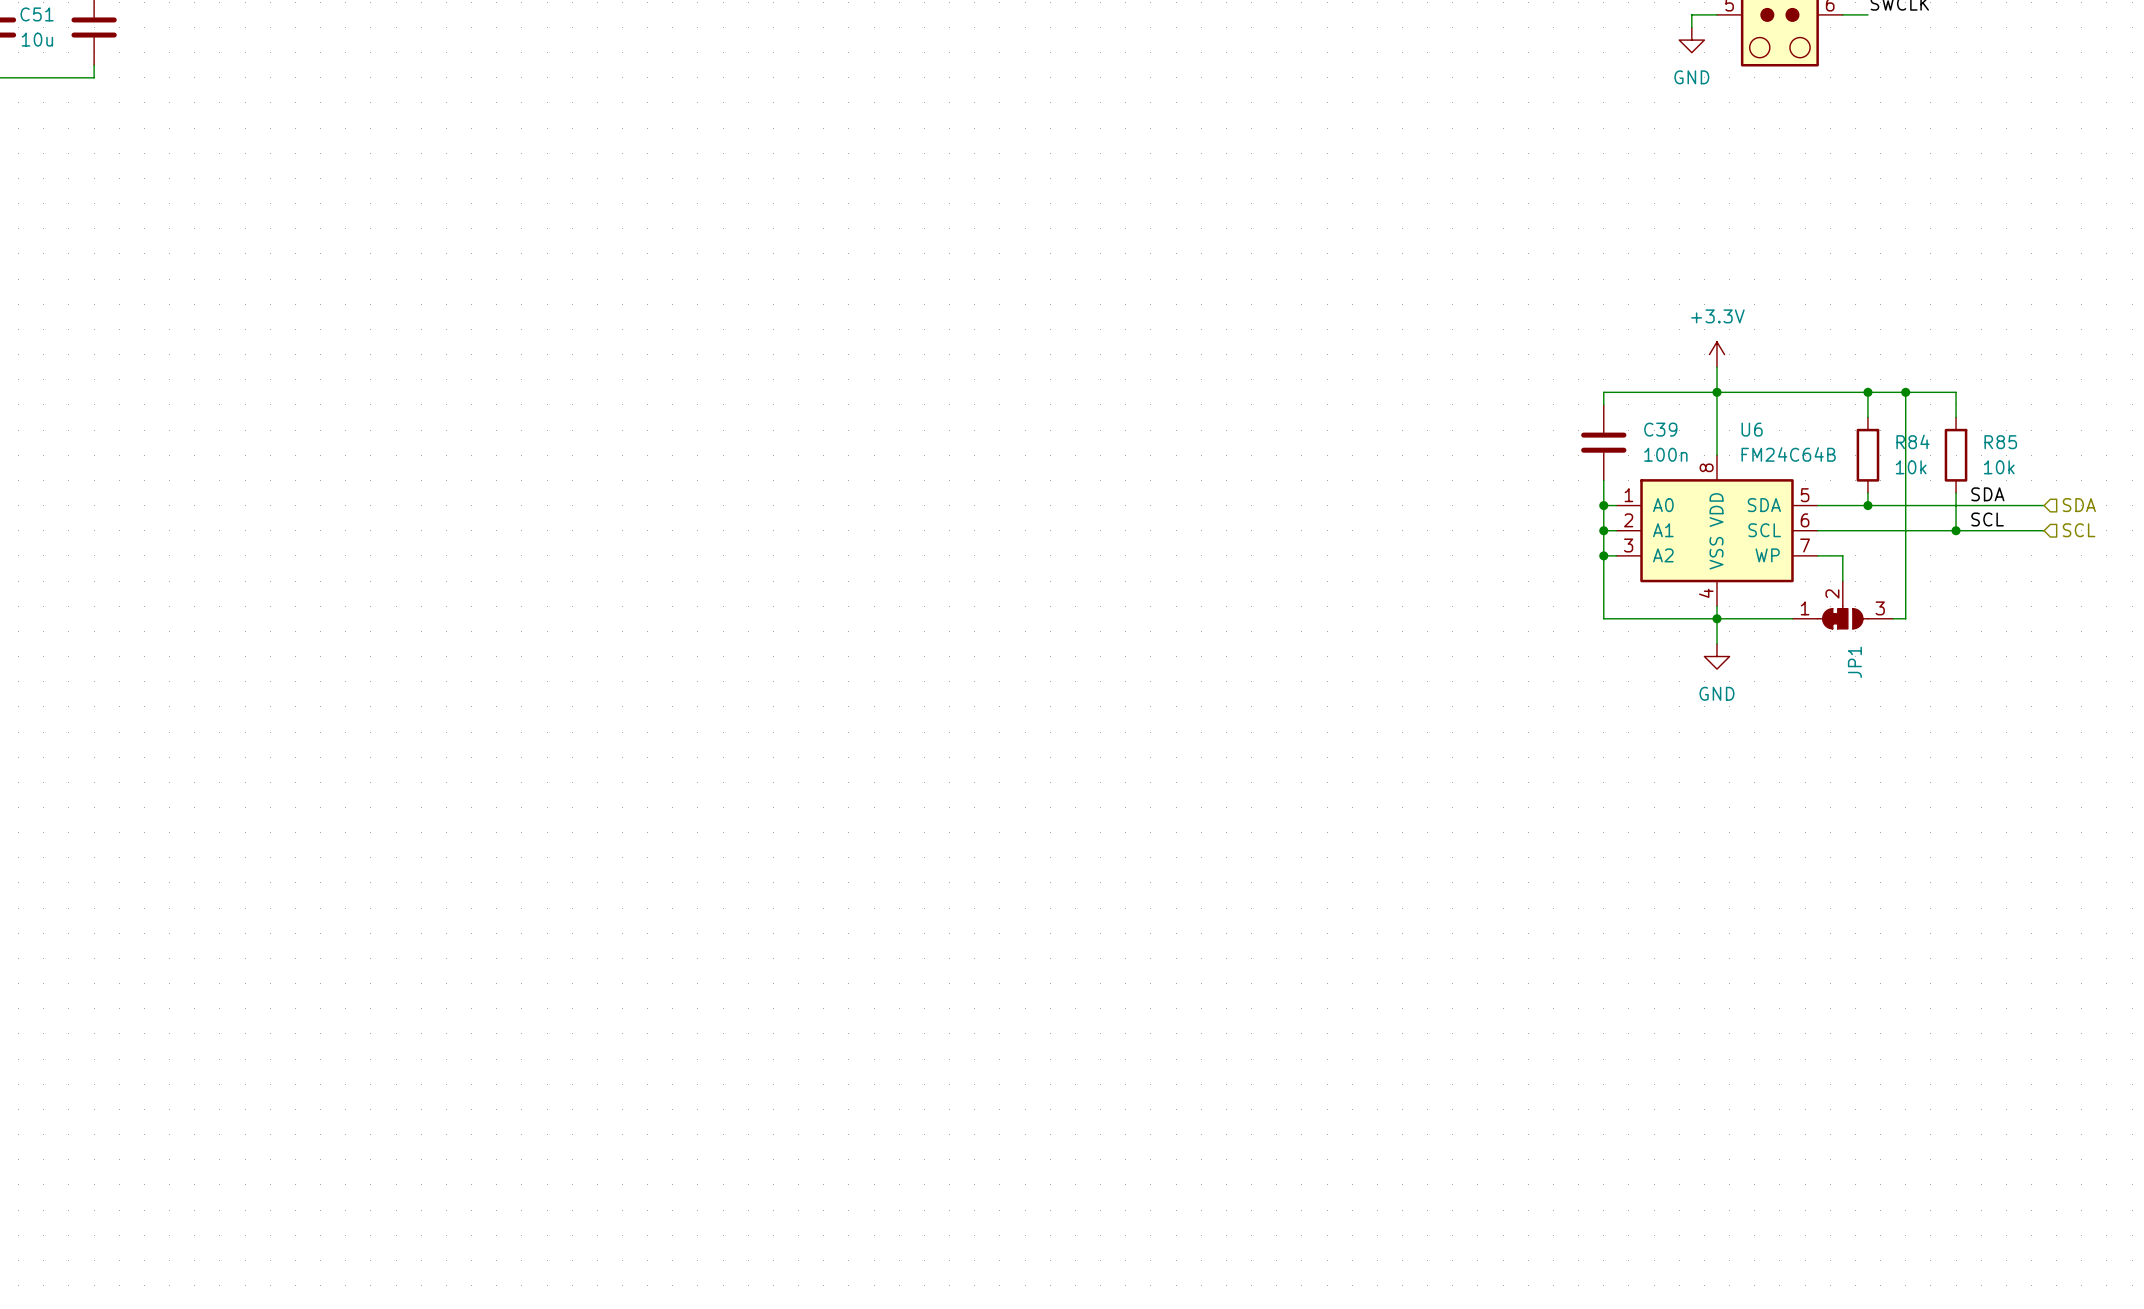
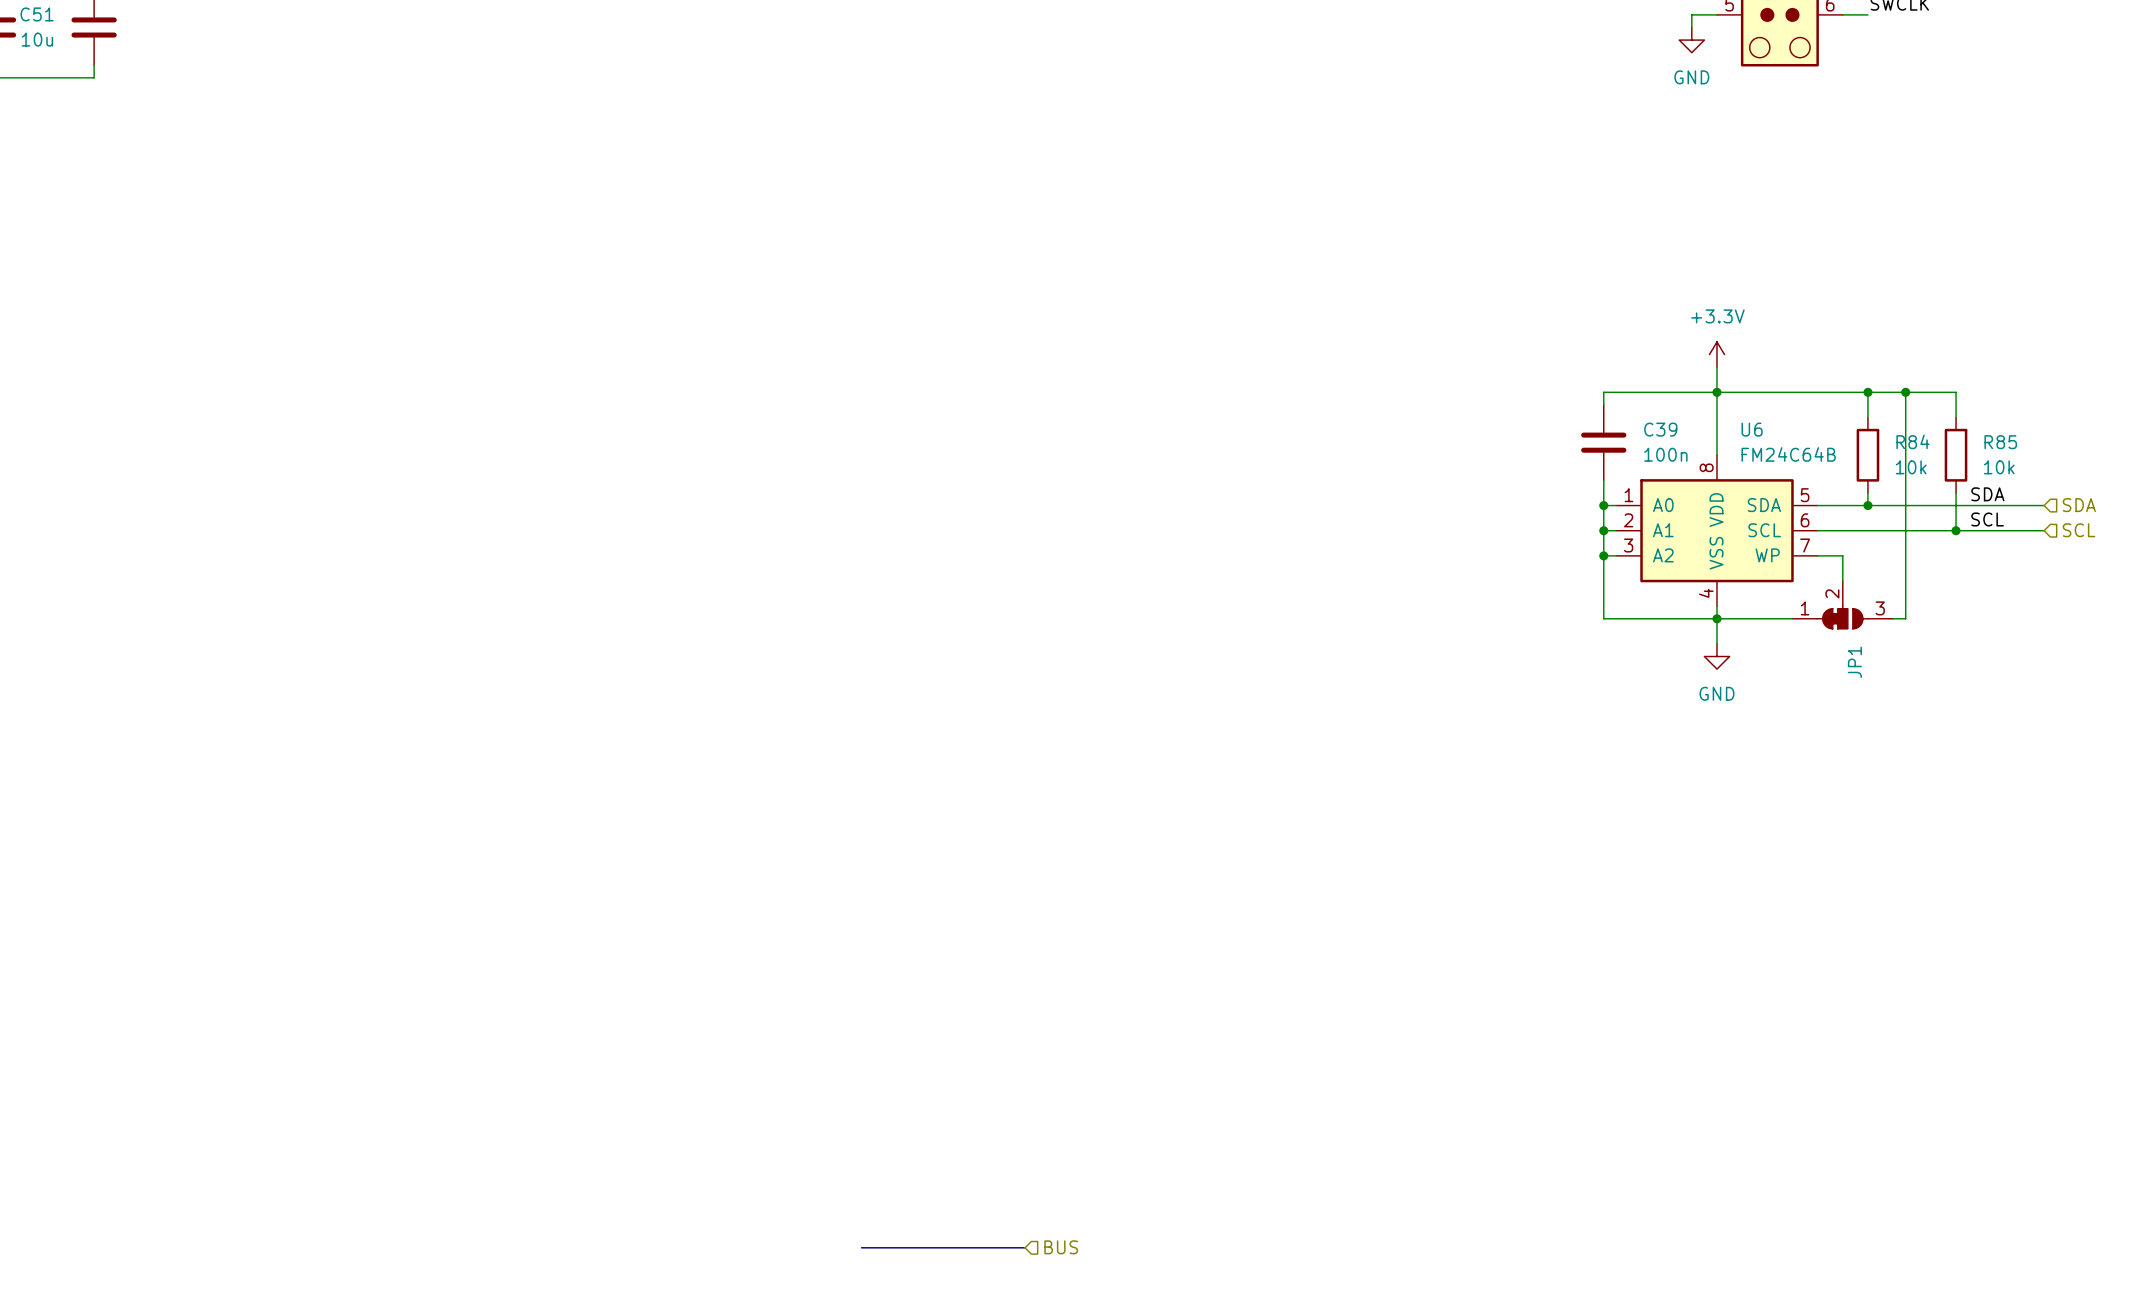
bus: none -> (861, 1247) (1025, 1247)
hierarchical label: none -> BUS (1061, 1247)

